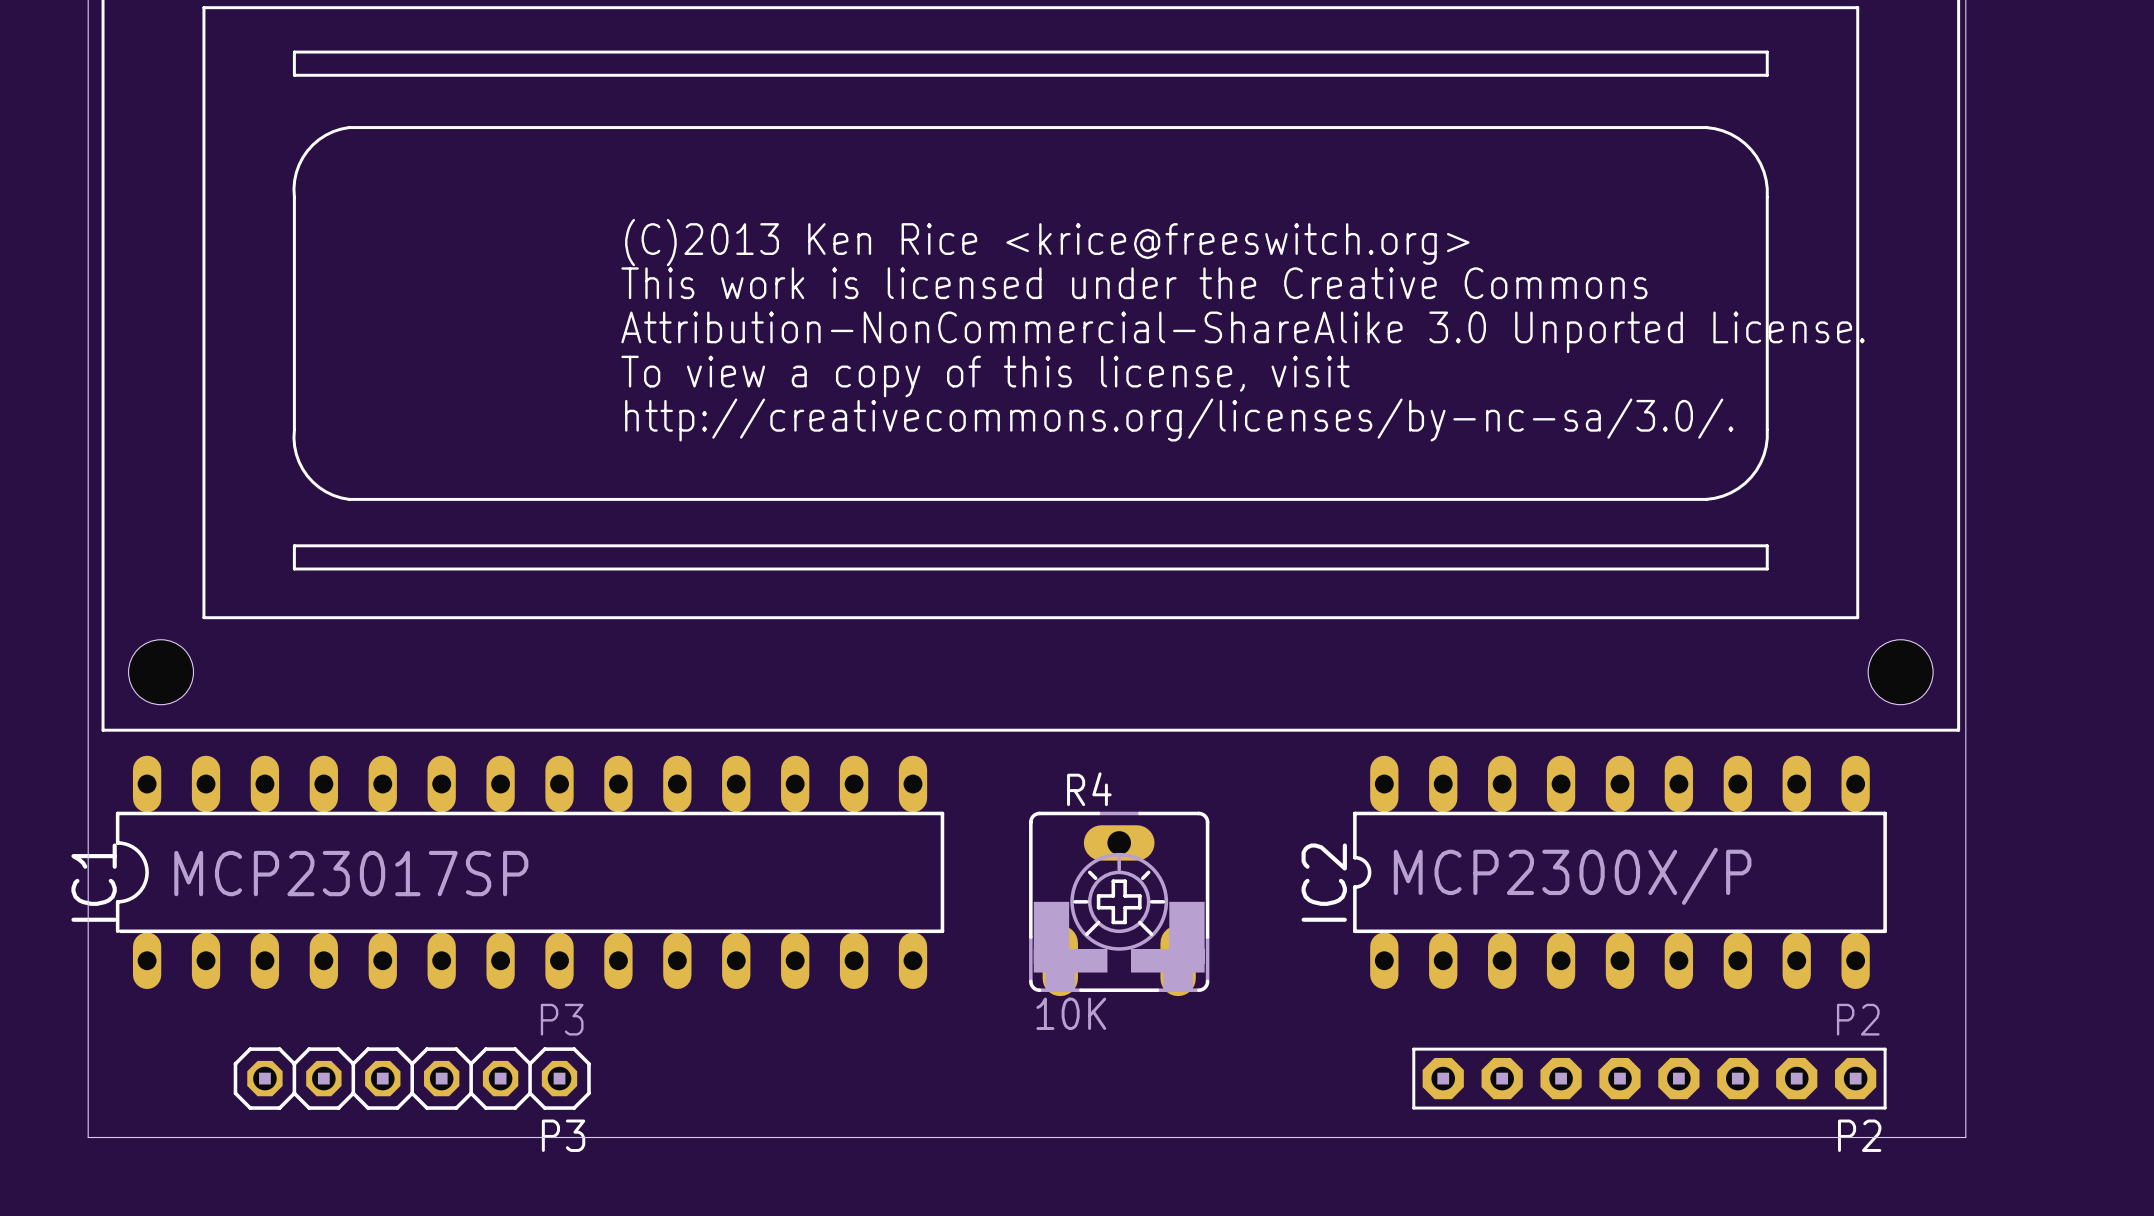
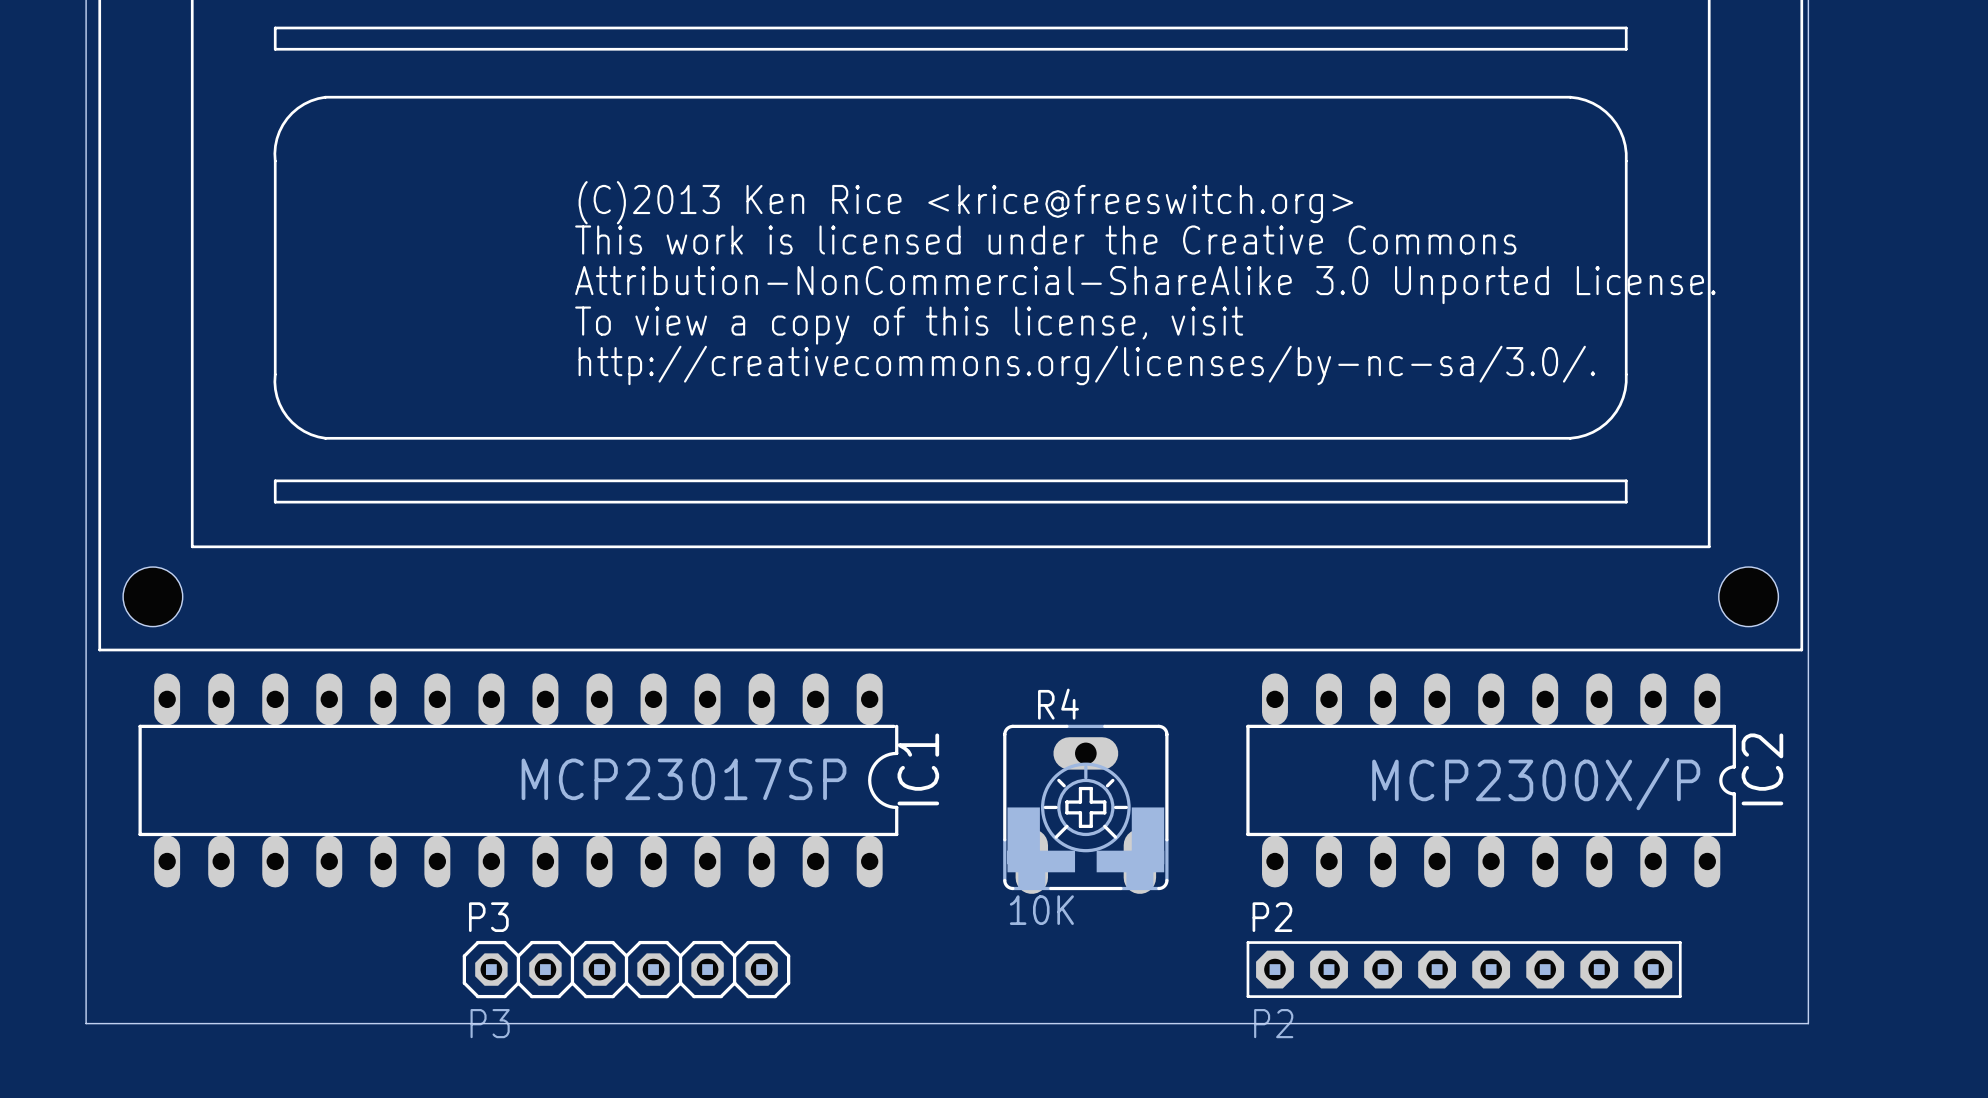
IC1 rotation: 0° (530, 872) -> 180° (518, 780)
IC2 rotation: 0° (1619, 872) -> 180° (1491, 780)
R4 position: (1119, 903) -> (1085, 809)
P3 value position: P3 (562, 1019) -> P3 (490, 1023)
P2 value position: P2 (1858, 1019) -> P2 (1273, 1023)
P3 position: (412, 1078) -> (626, 969)
P2 position: (1649, 1078) -> (1464, 969)
P3 name position: P3 (563, 1135) -> P3 (488, 917)
P2 name position: P2 (1859, 1135) -> P2 (1272, 917)

